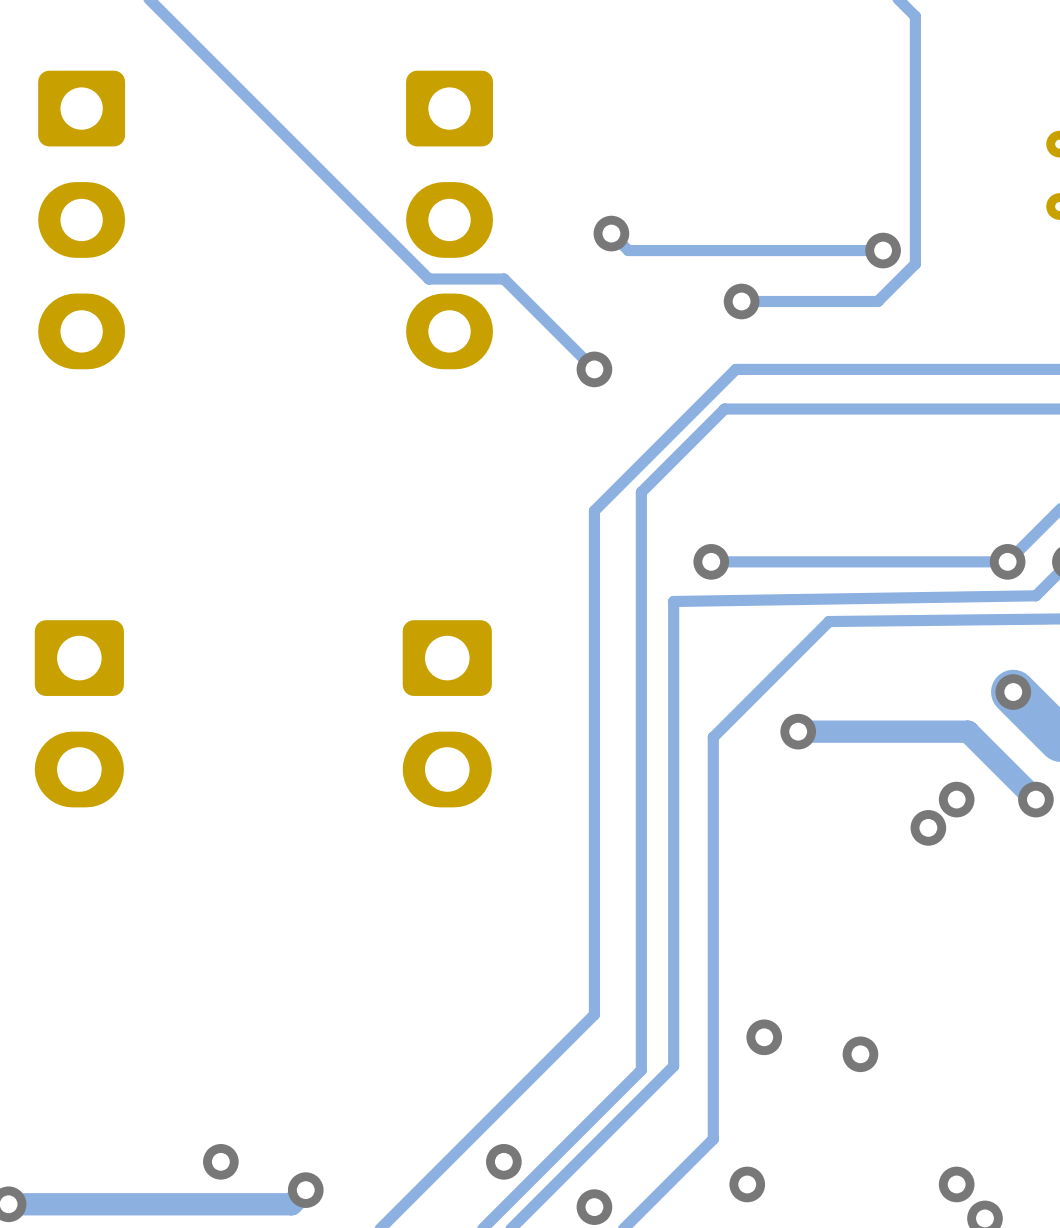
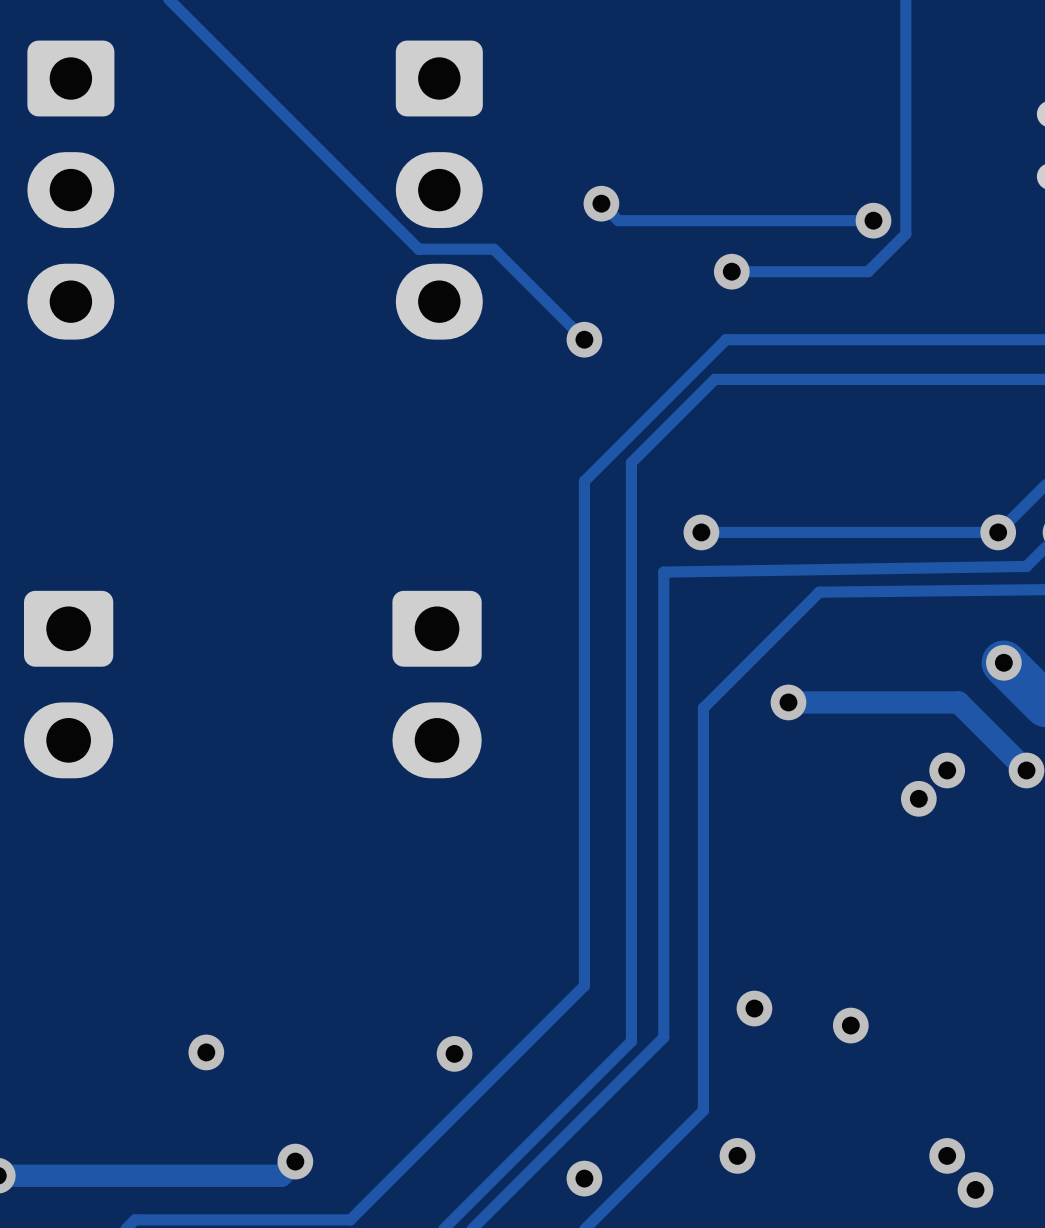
via position: (220, 1161) -> (206, 1052)
via position: (503, 1161) -> (454, 1053)

